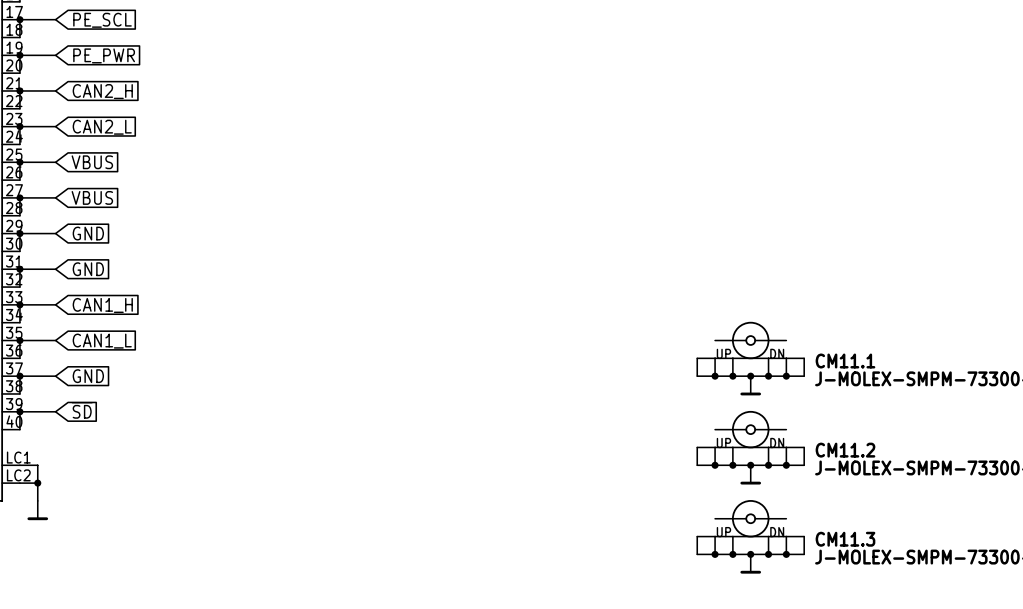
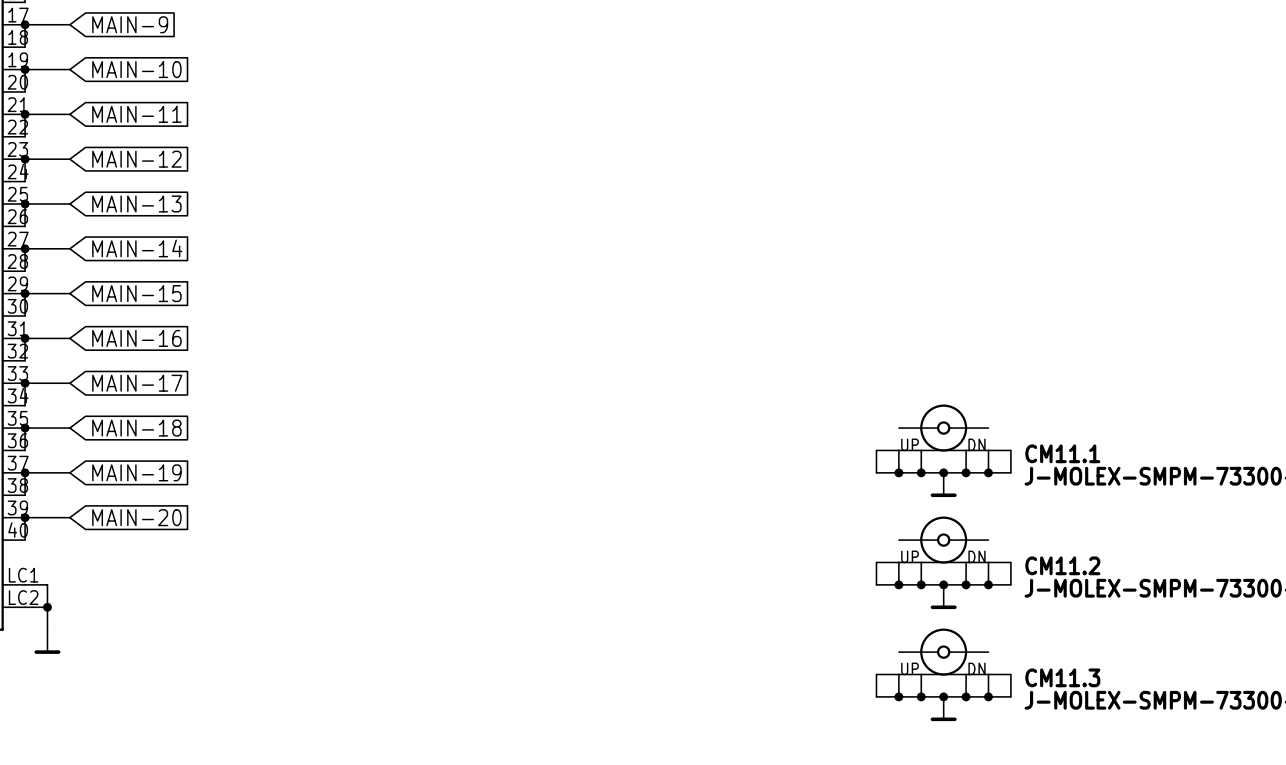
global label: PE_SCL (102, 20) -> MAIN-9 (130, 24)
global label: PE_PWR (104, 55) -> MAIN-10 (136, 69)
global label: CAN2_H (102, 91) -> MAIN-11 (136, 114)
global label: CAN2_L (102, 127) -> MAIN-12 (136, 159)
global label: VBUS (92, 162) -> MAIN-13 (136, 203)
global label: VBUS (92, 197) -> MAIN-14 (137, 248)
global label: GND (88, 233) -> MAIN-15 (136, 293)
global label: GND (88, 269) -> MAIN-16 (136, 338)
global label: CAN1_H (102, 305) -> MAIN-17 (137, 383)
global label: CAN1_L (102, 341) -> MAIN-18 (136, 428)
global label: GND (88, 376) -> MAIN-19 (136, 472)
global label: ~{SD} (82, 410) -> MAIN-20 (136, 517)

